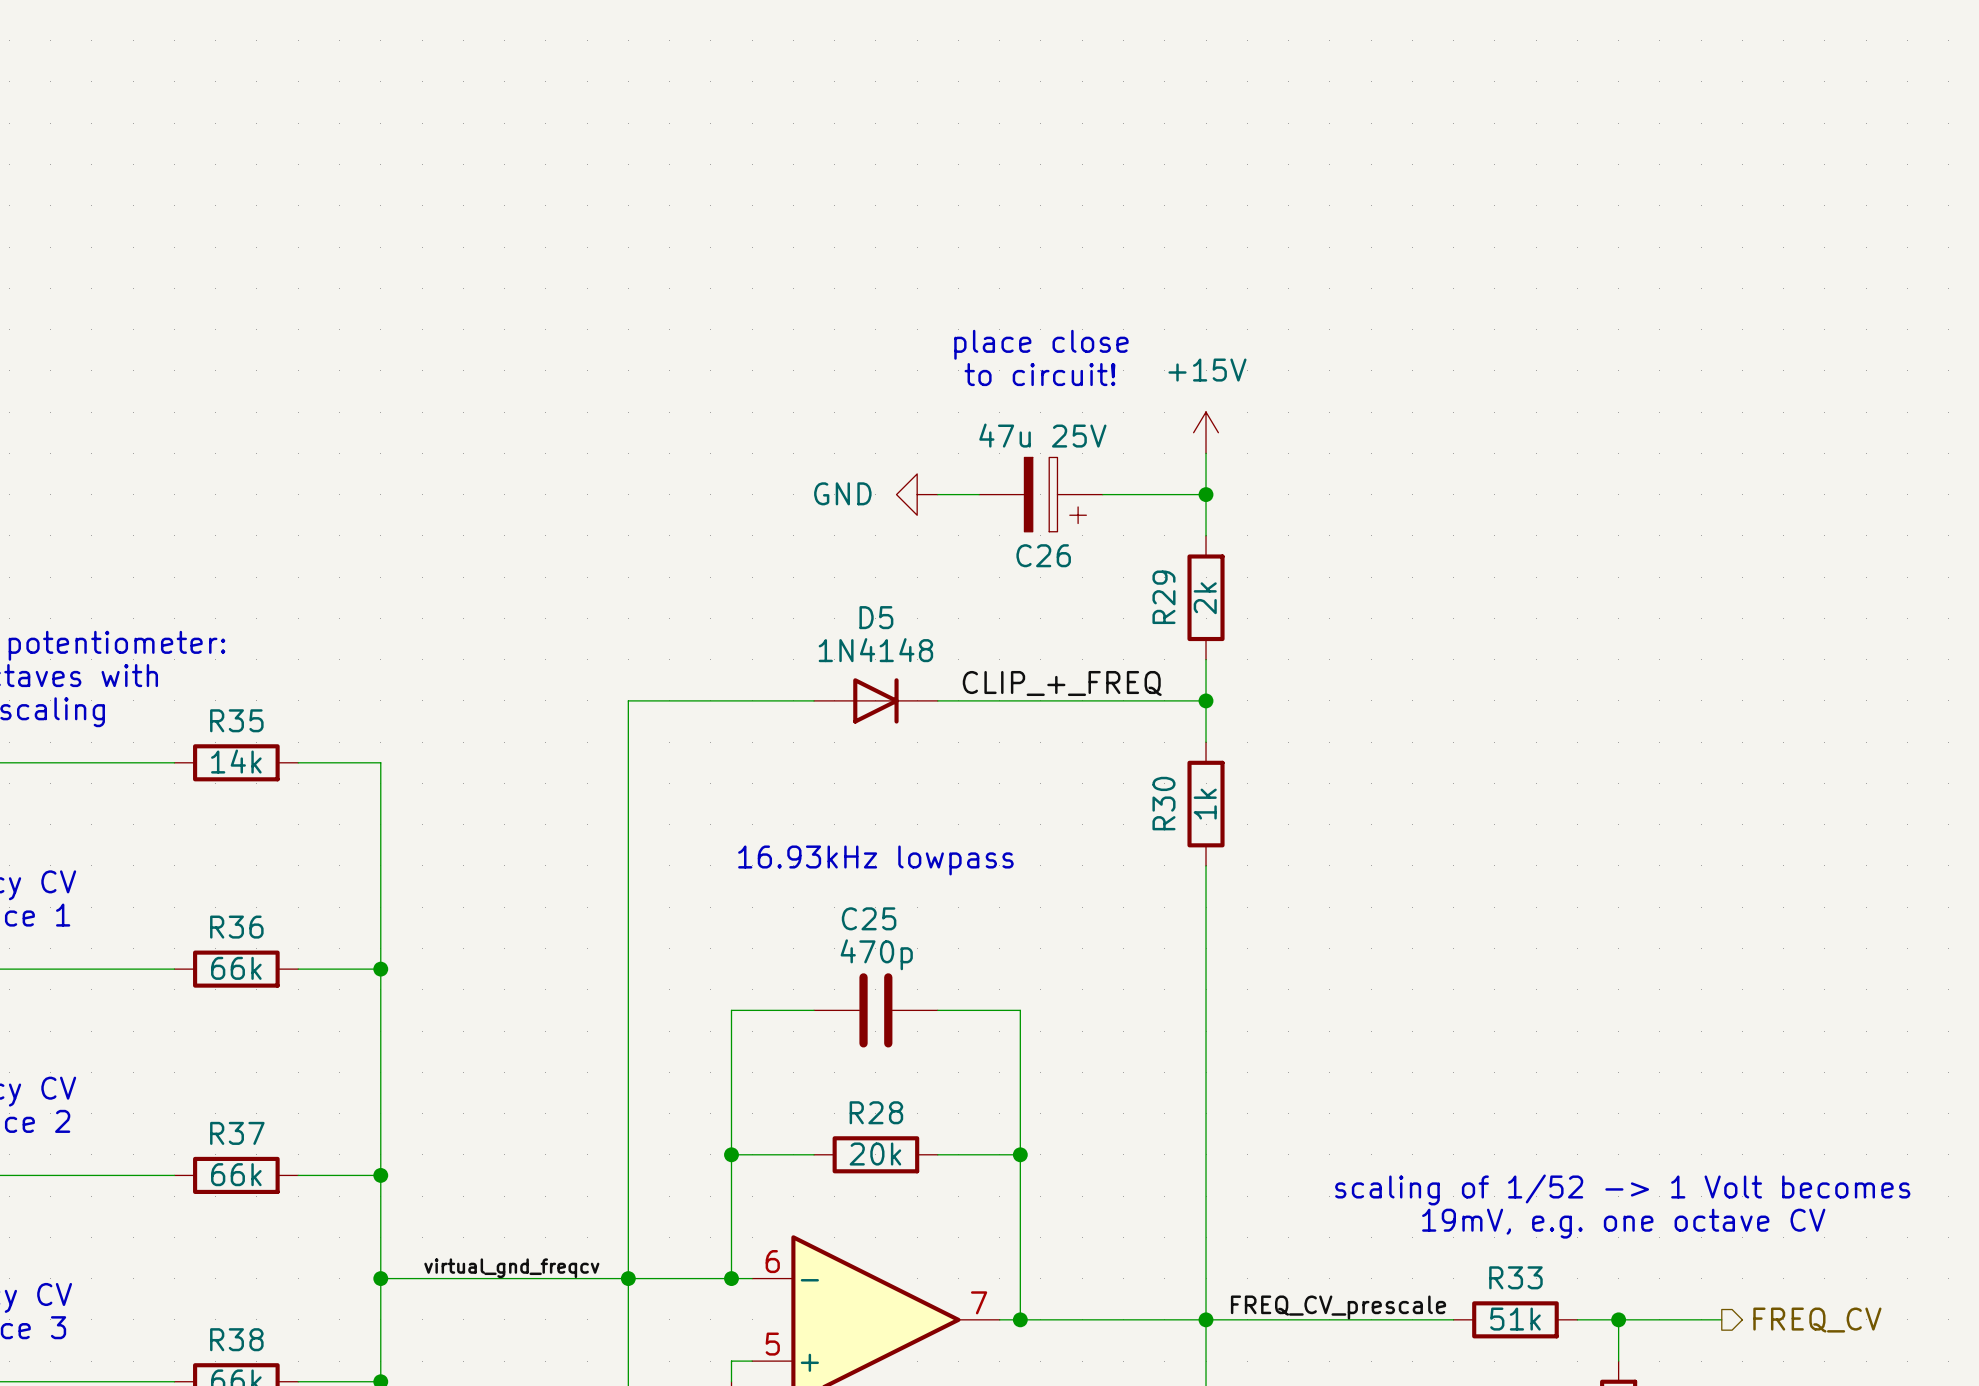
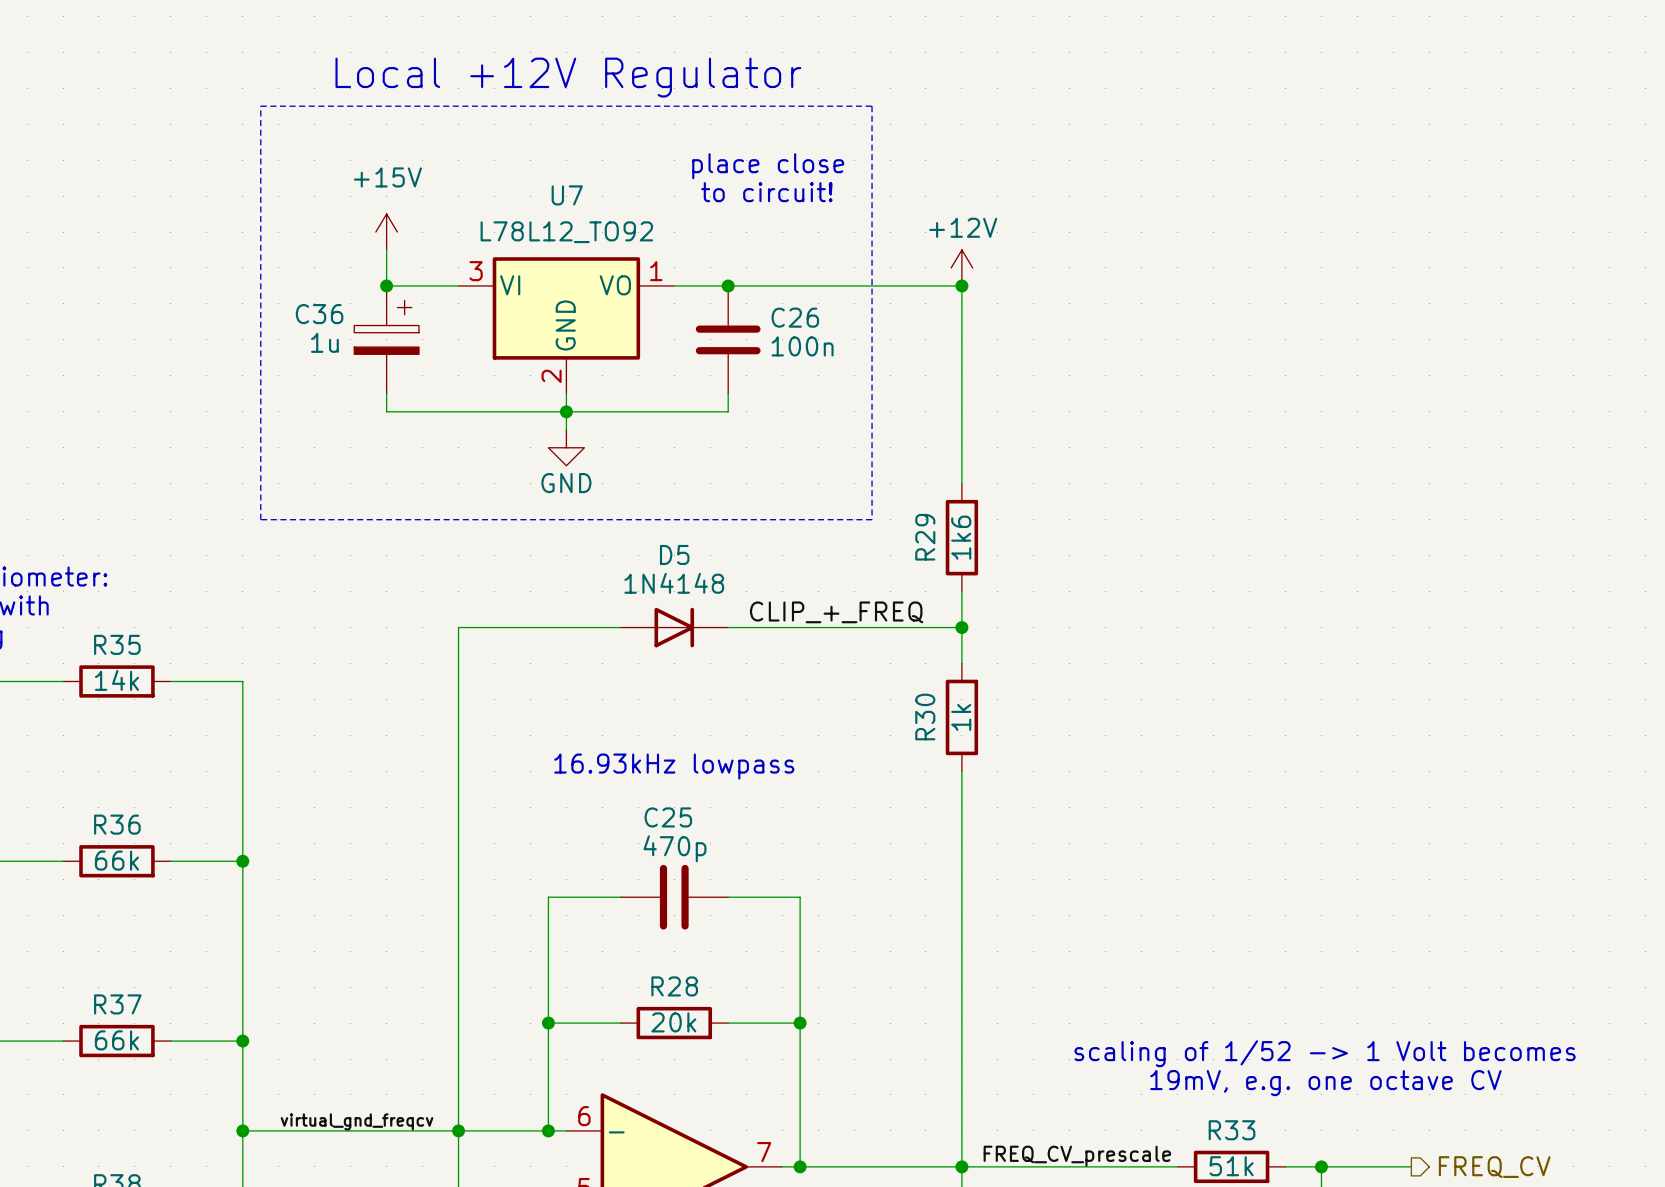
text: none -> Local +12V Regulator (568, 77)
line: none -> (260, 106) (872, 106) (872, 519) (260, 519) (260, 106)
power symbol: none -> +15V (386, 232)
wire: none -> (386, 250) (386, 285) (458, 285)
power symbol: none -> +12V (961, 267)
junction: none -> (386, 285)
wire: none -> (674, 285) (961, 285) (961, 411)
junction: none -> (728, 285)
junction: none -> (961, 285)
text position: place close (1041, 344) -> place close (768, 166)
U7: none -> L78L12_TO92 (566, 325)
C36: none -> 1u (386, 339)
text position: to circuit! (1039, 374) -> to circuit! (766, 192)
wire: none -> (386, 393) (386, 411) (728, 411) (728, 393)
wire: none -> (566, 393) (566, 429)
power symbol: +15V (1206, 432) -> none
C26 value: 47u 25V (1042, 435) -> 100n (802, 346)
junction: none -> (566, 411)
C26 symbol: [979, 457, 1103, 532] -> [695, 285, 761, 394]
power symbol text position: GND (842, 493) -> GND (566, 483)
power symbol rotation: 0° (917, 494) -> 90° counterclockwise (566, 447)
power symbol position: GND (917, 494) -> GND (566, 447)
wire: (937, 494) (979, 494) -> none
wire: (1102, 494) (1206, 494) -> none
junction: (1206, 494) -> none
C26 name position: C26 (1043, 555) -> C26 (795, 317)
R29 value: 2k (1205, 598) -> 1k6 (961, 537)

